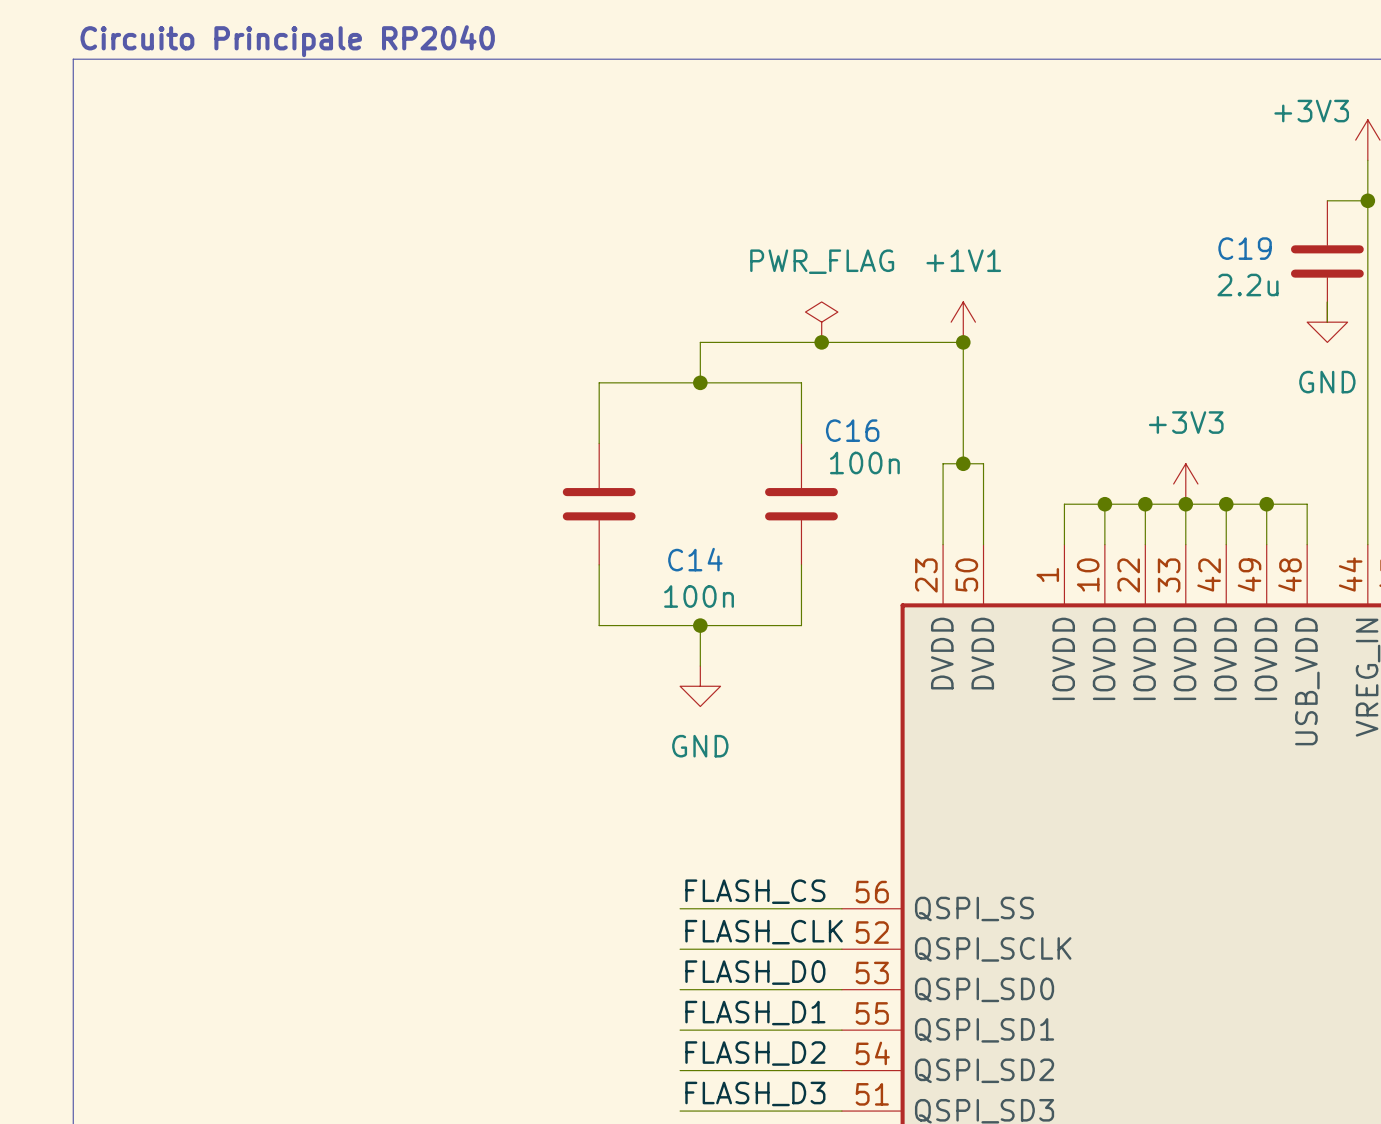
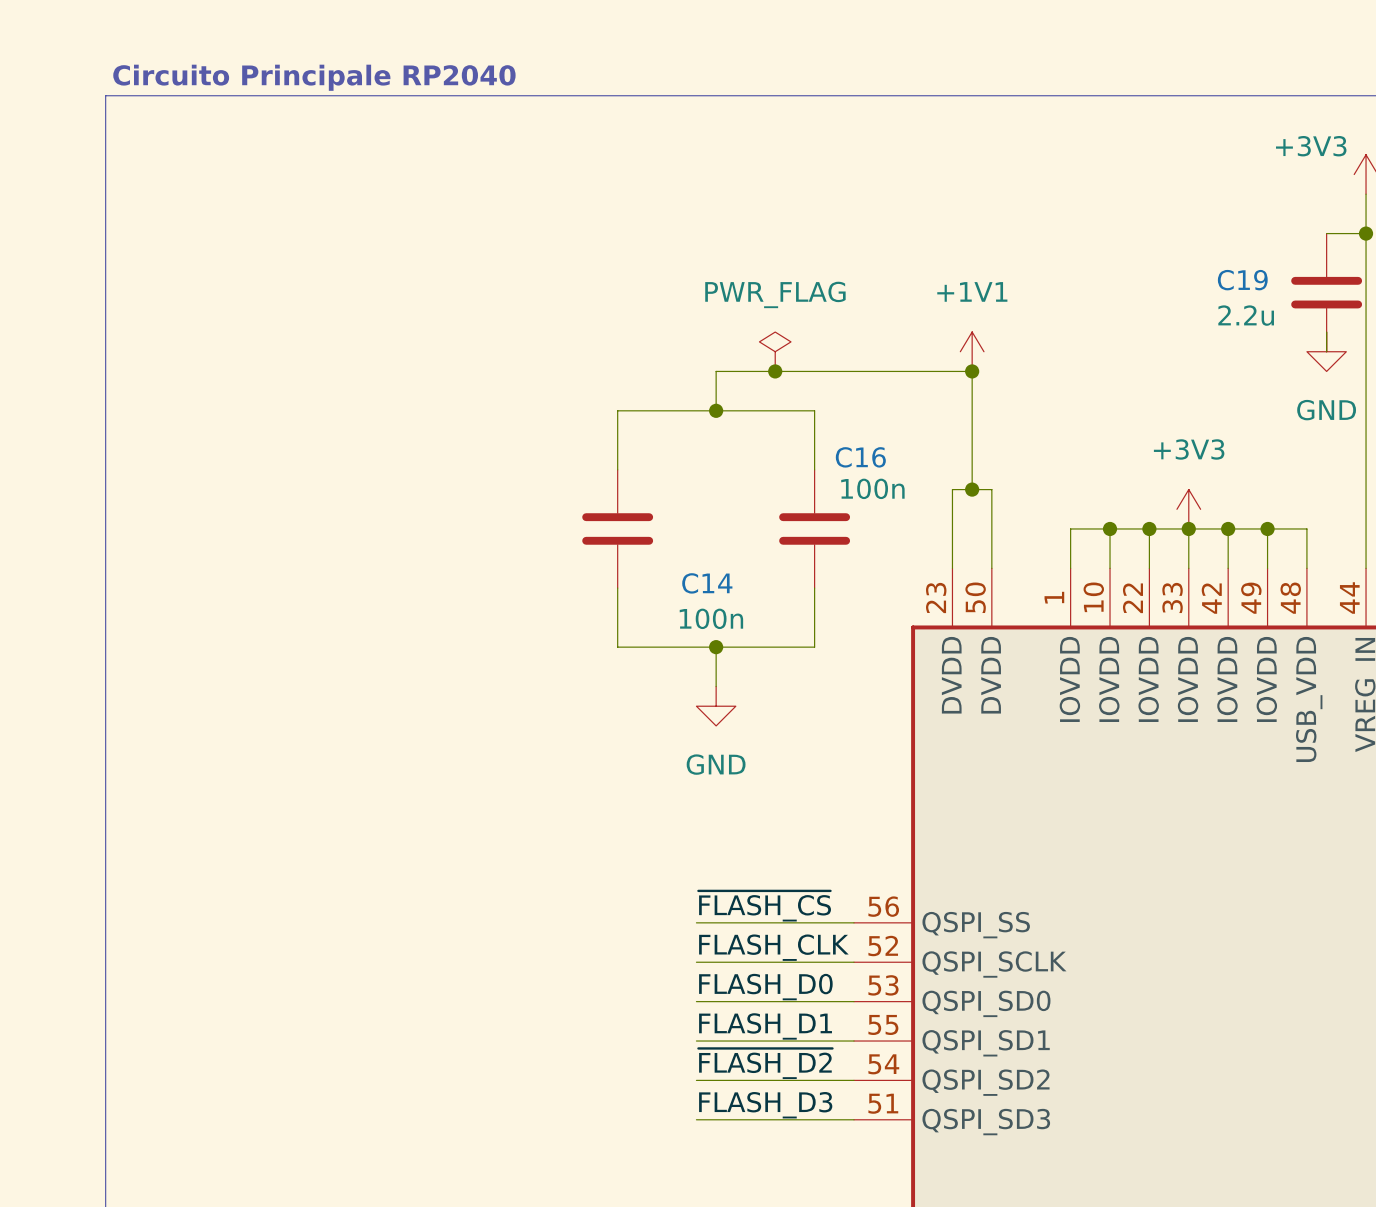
power symbol position: PWR_FLAG (821, 322) -> PWR_FLAG (775, 351)
junction position: (821, 342) -> (775, 371)
label: FLASH_CS (755, 891) -> ~{FLASH_CS} (764, 906)
label: FLASH_D2 (755, 1053) -> ~{FLASH_D2} (765, 1063)

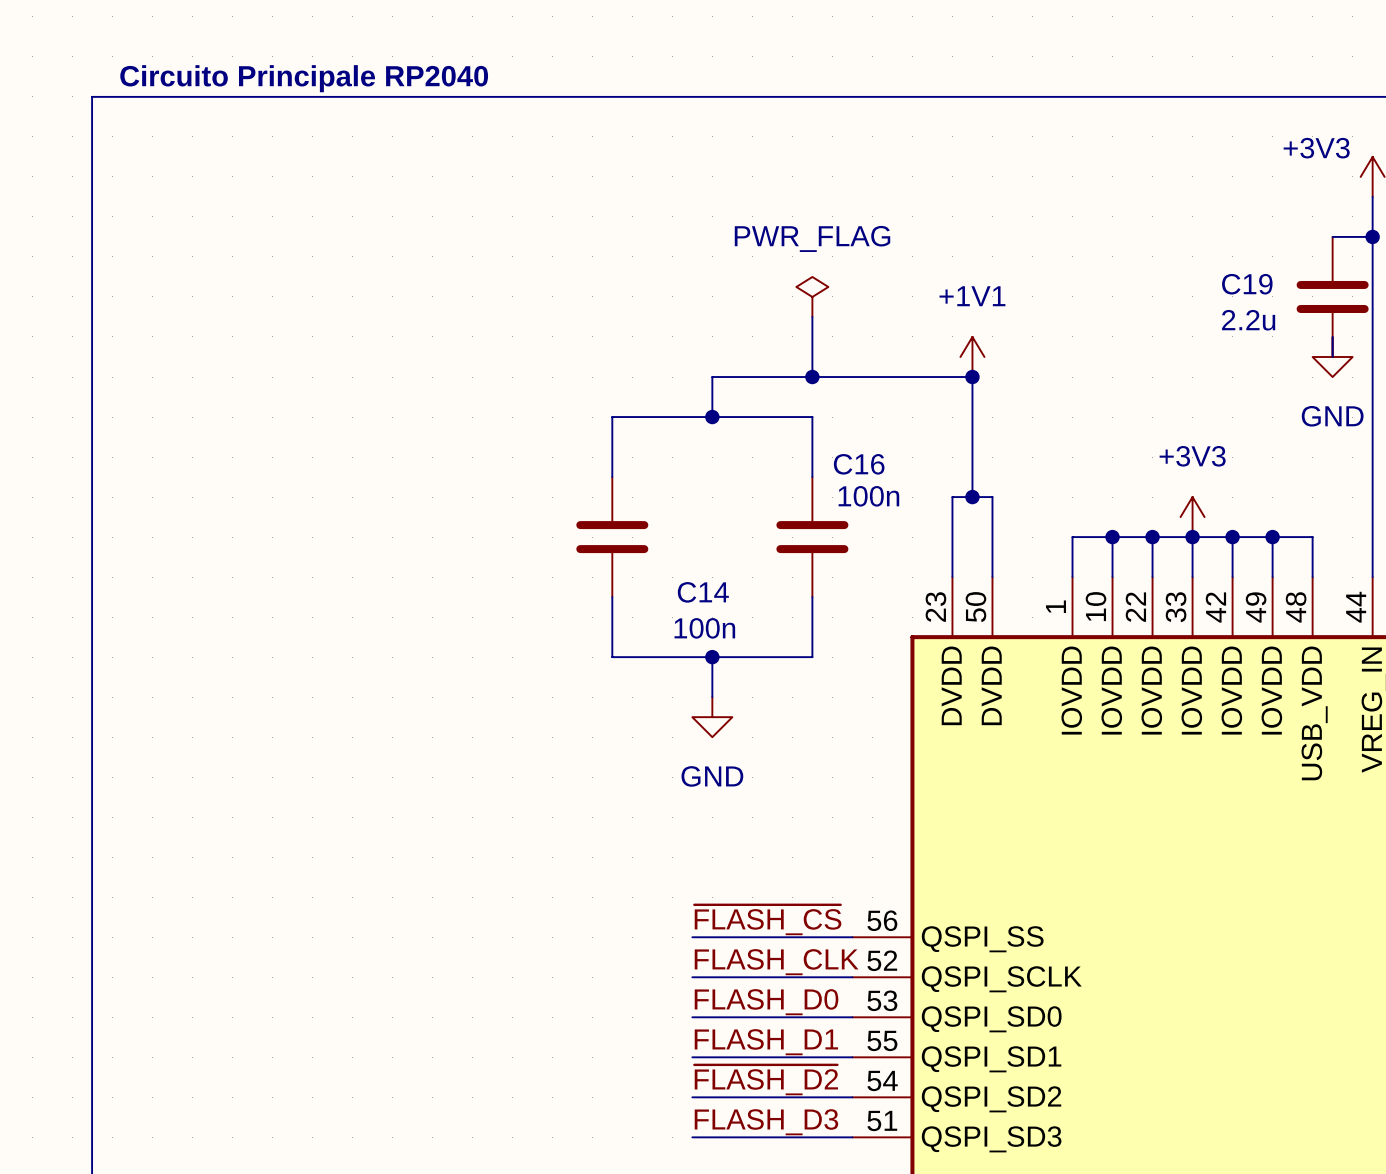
wire: none -> (812, 316) (812, 377)
power symbol position: PWR_FLAG (775, 351) -> PWR_FLAG (812, 296)
junction position: (775, 371) -> (812, 377)

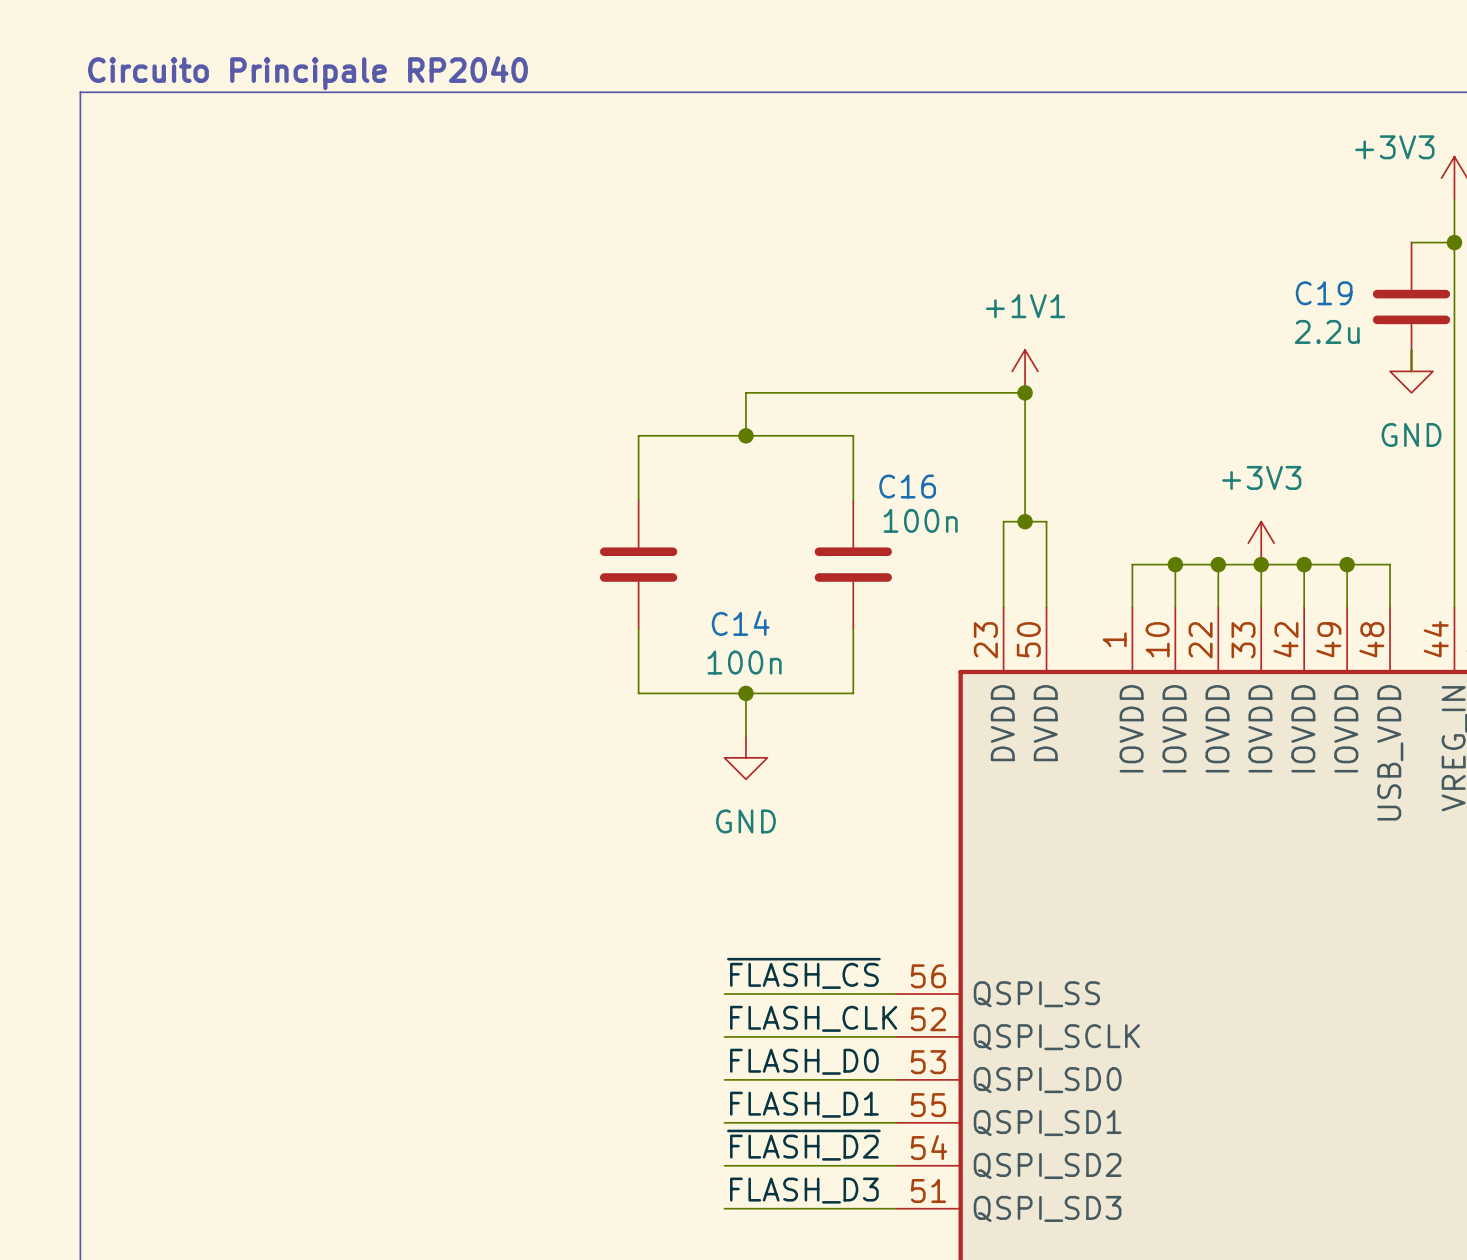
power symbol: PWR_FLAG (812, 296) -> none
wire: (812, 316) (812, 377) -> none
junction: (812, 377) -> none

